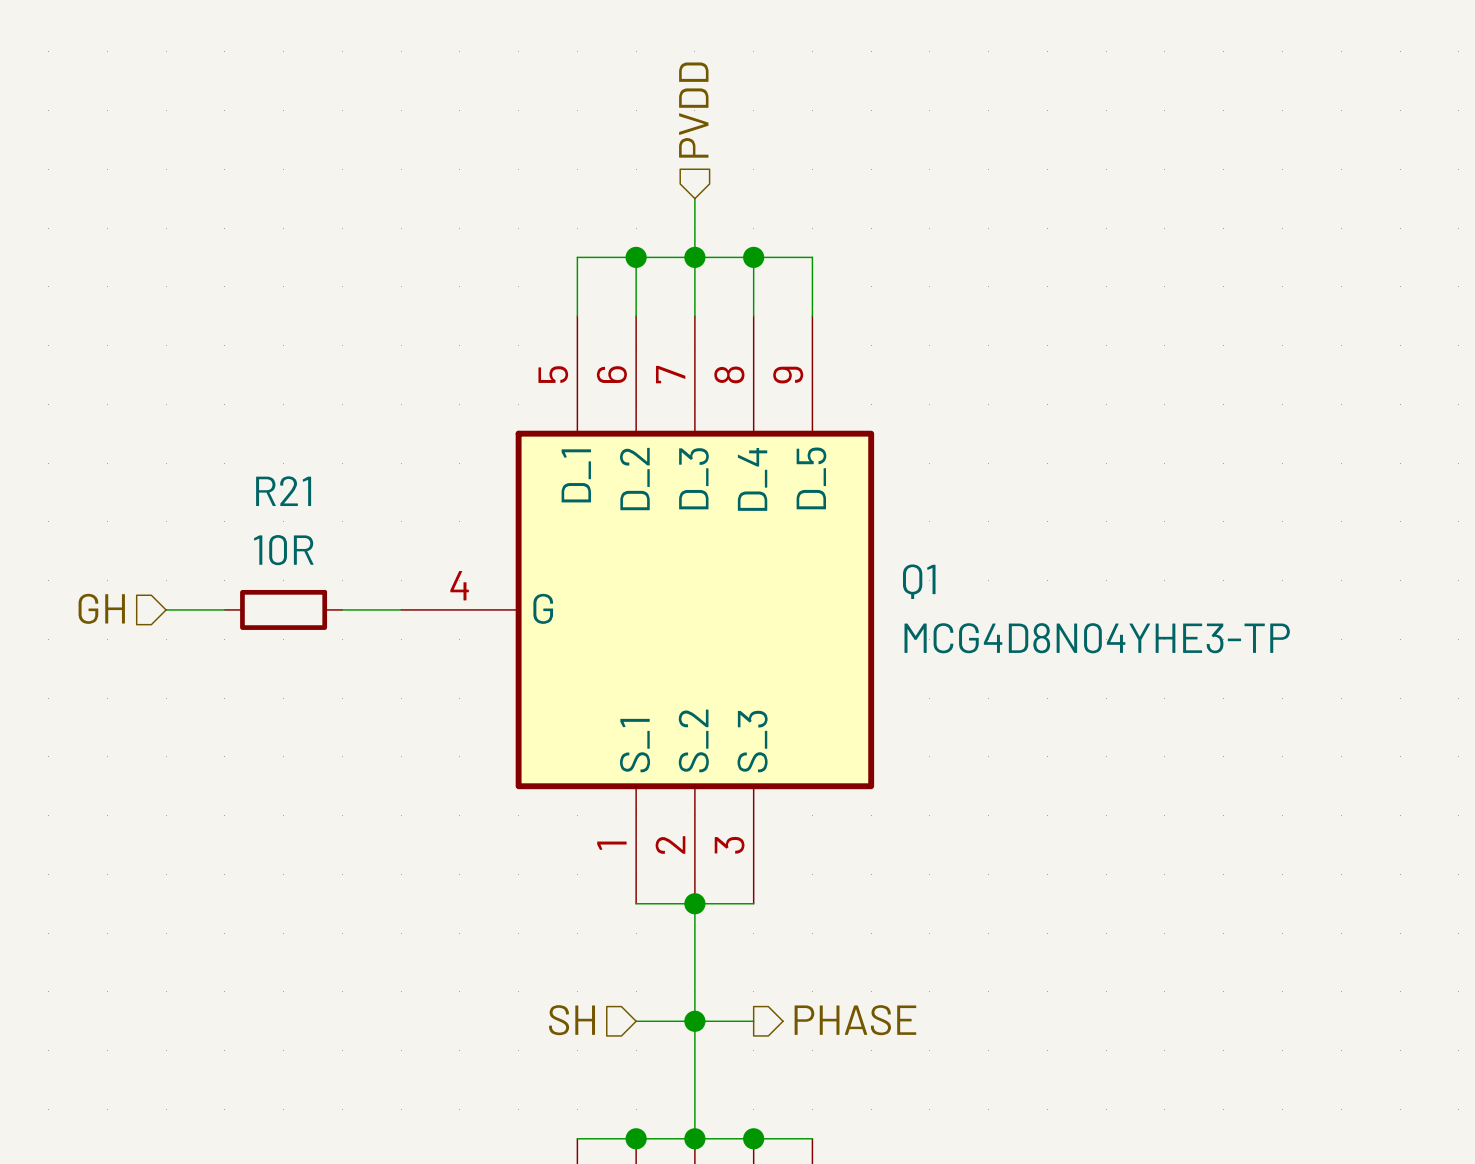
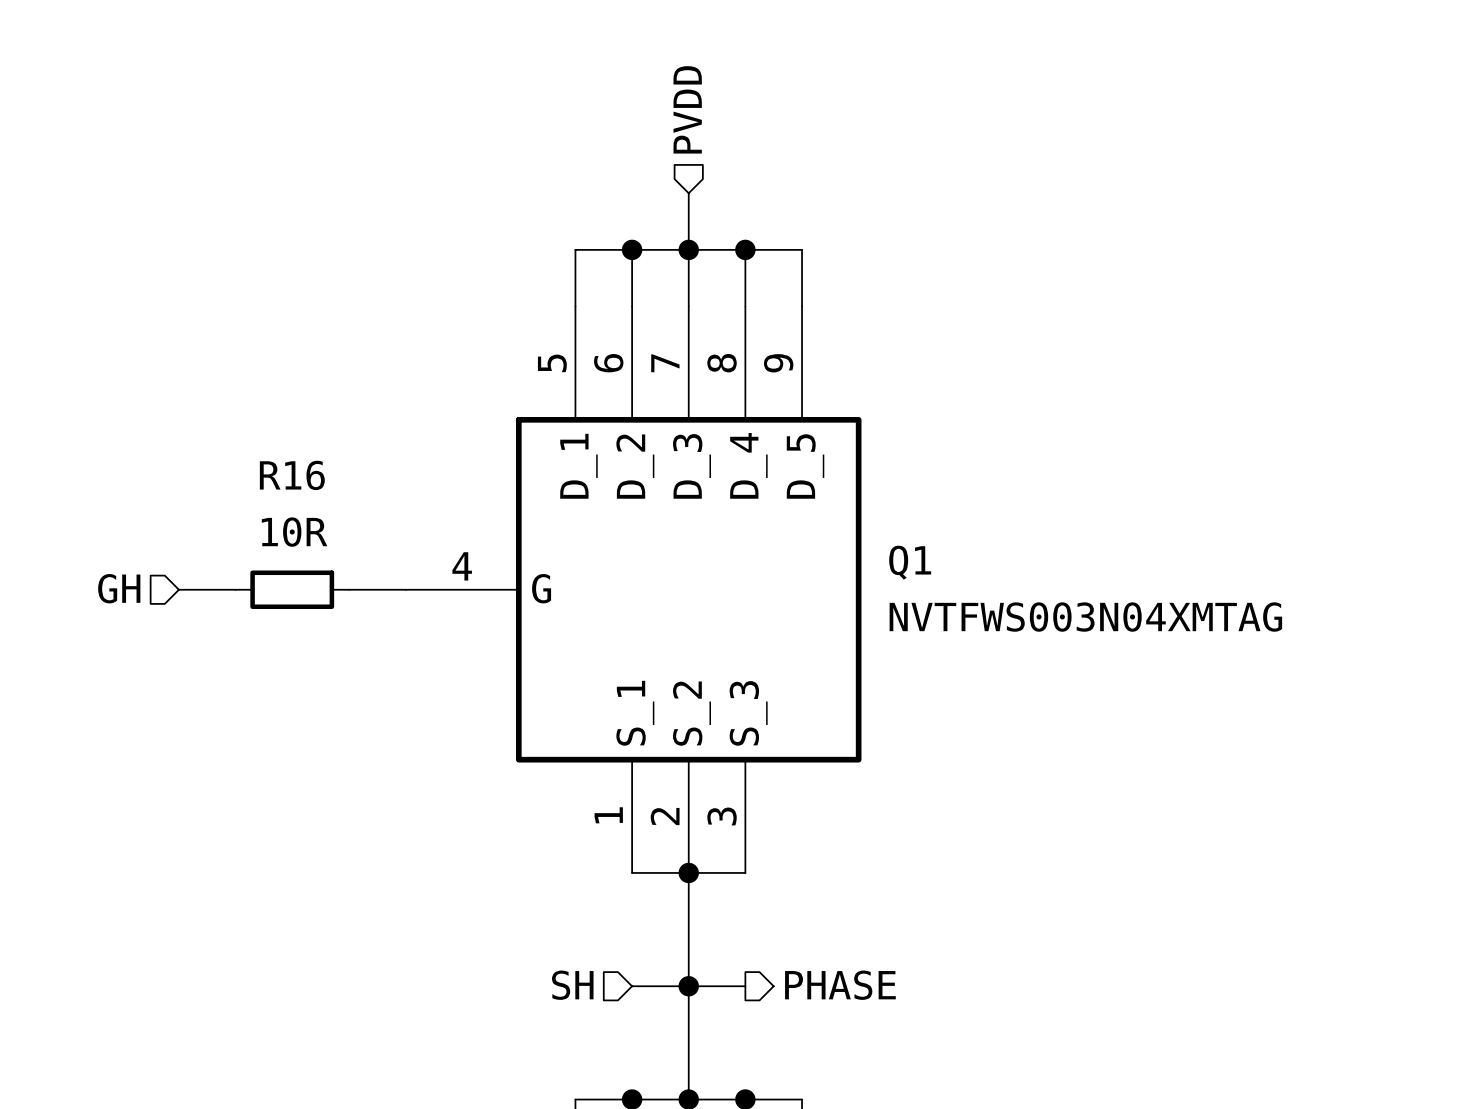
R21 name: R21 (283, 491) -> R16 (292, 475)
Q1 value: MCG4D8N04YHE3-TP (1097, 638) -> NVTFWS003N04XMTAG (1085, 617)

